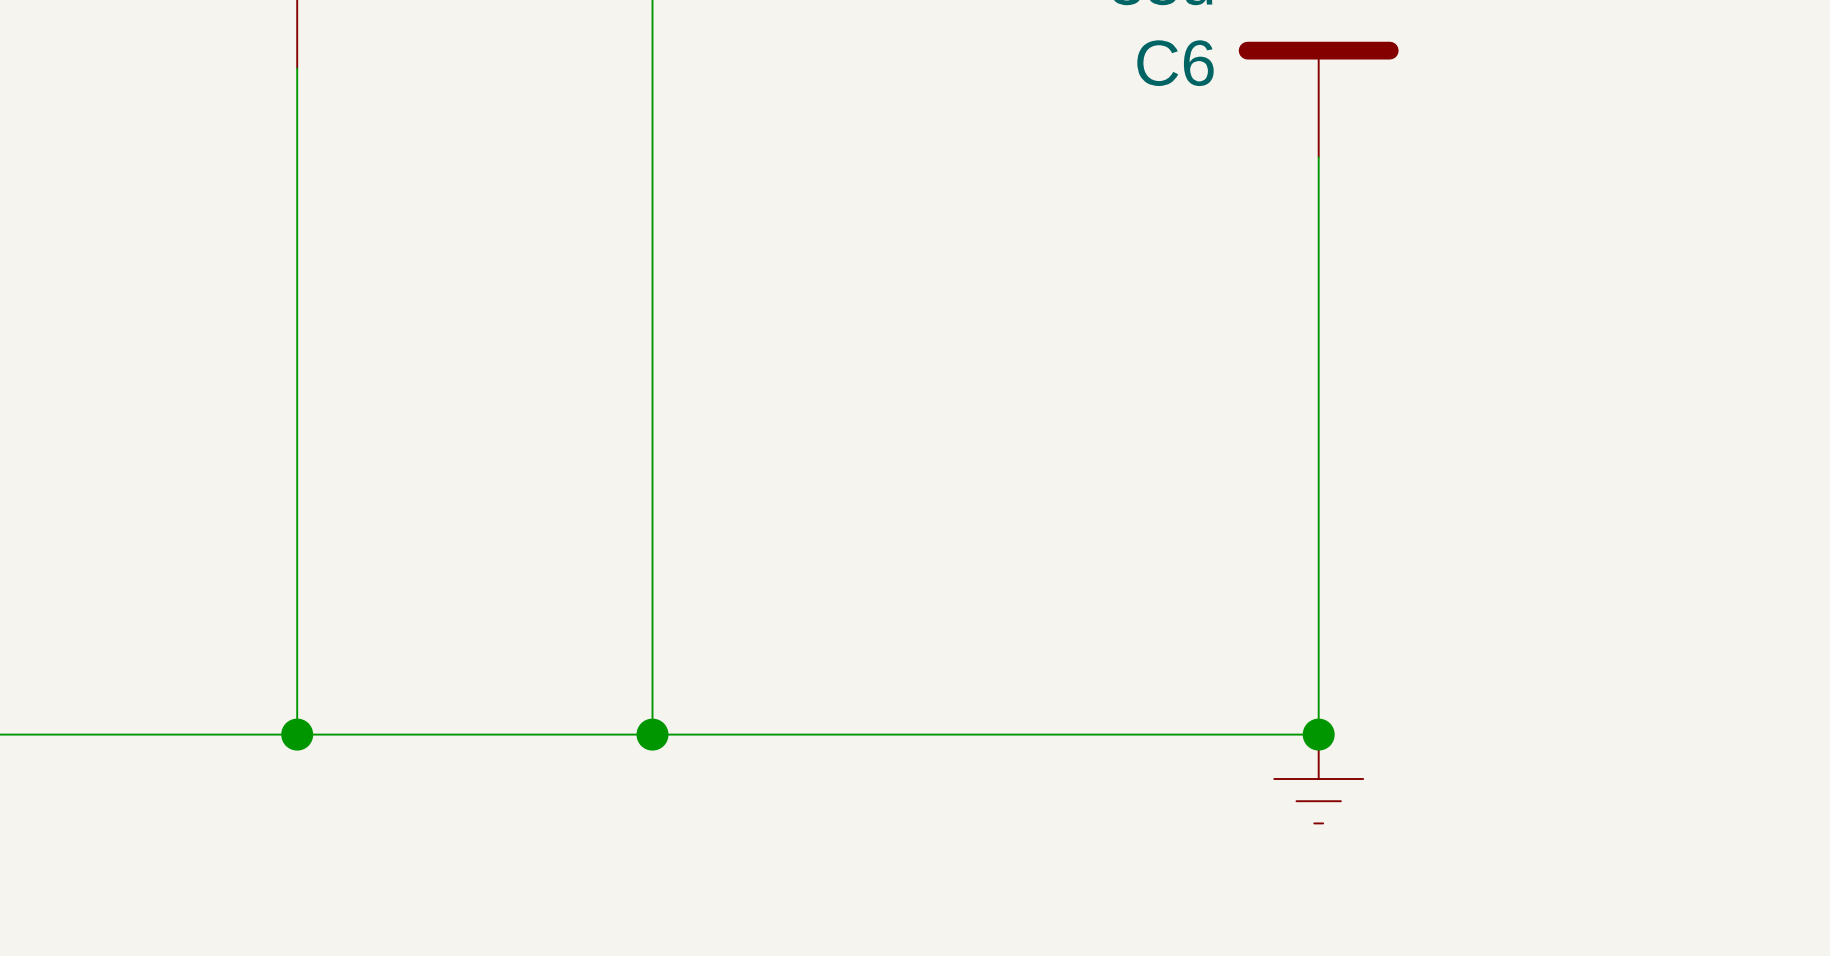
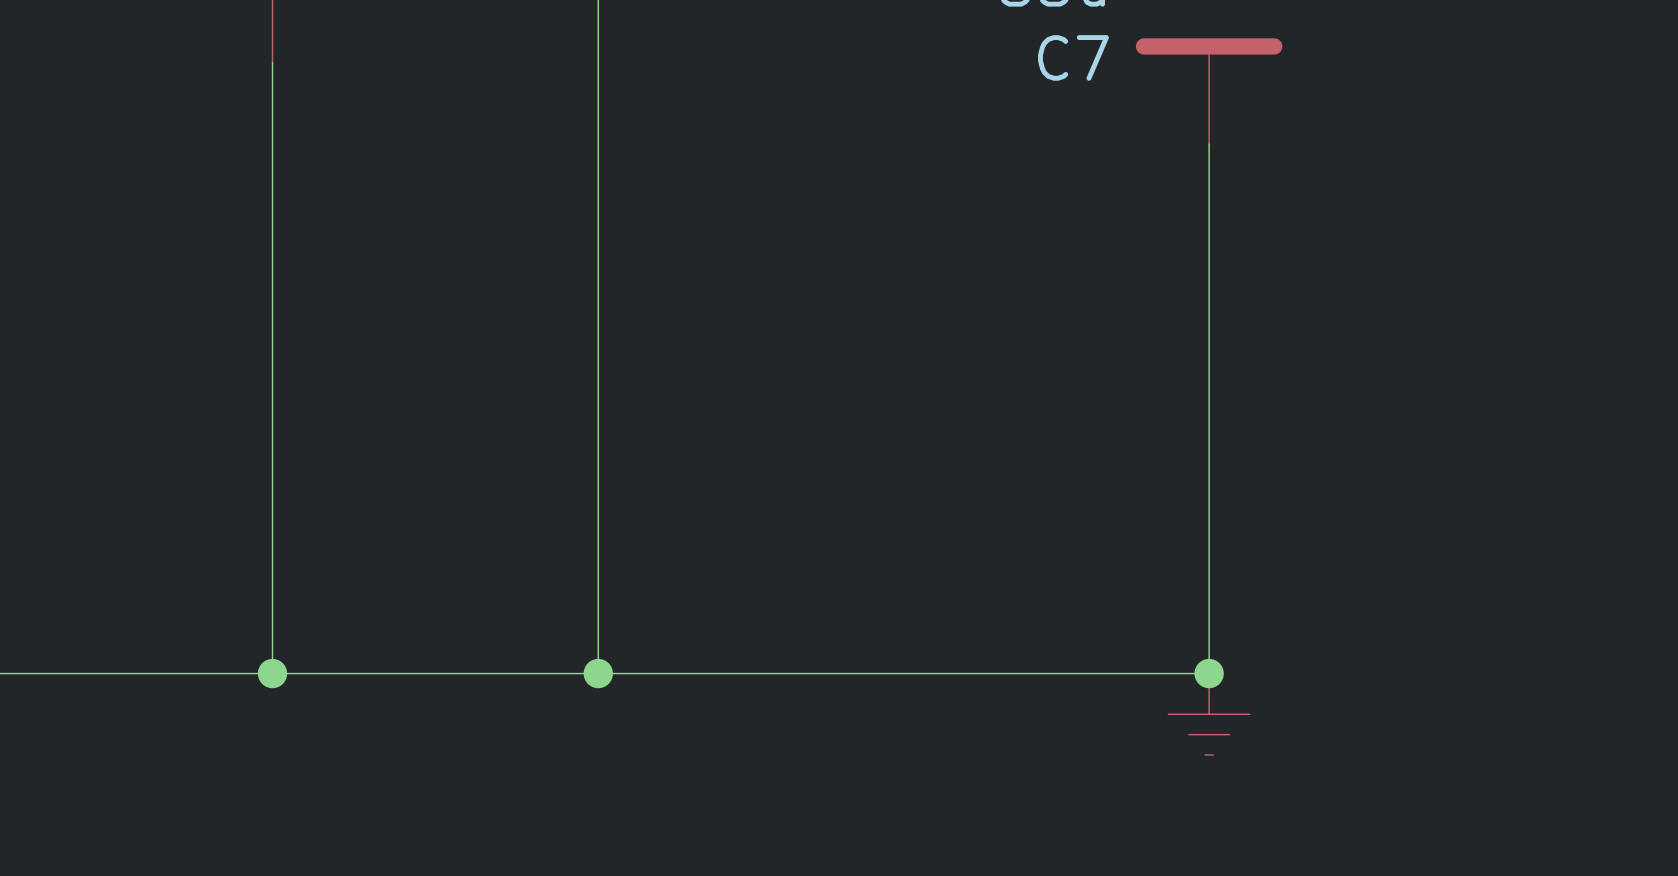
C6 name: C6 (1175, 63) -> C7 (1073, 57)

